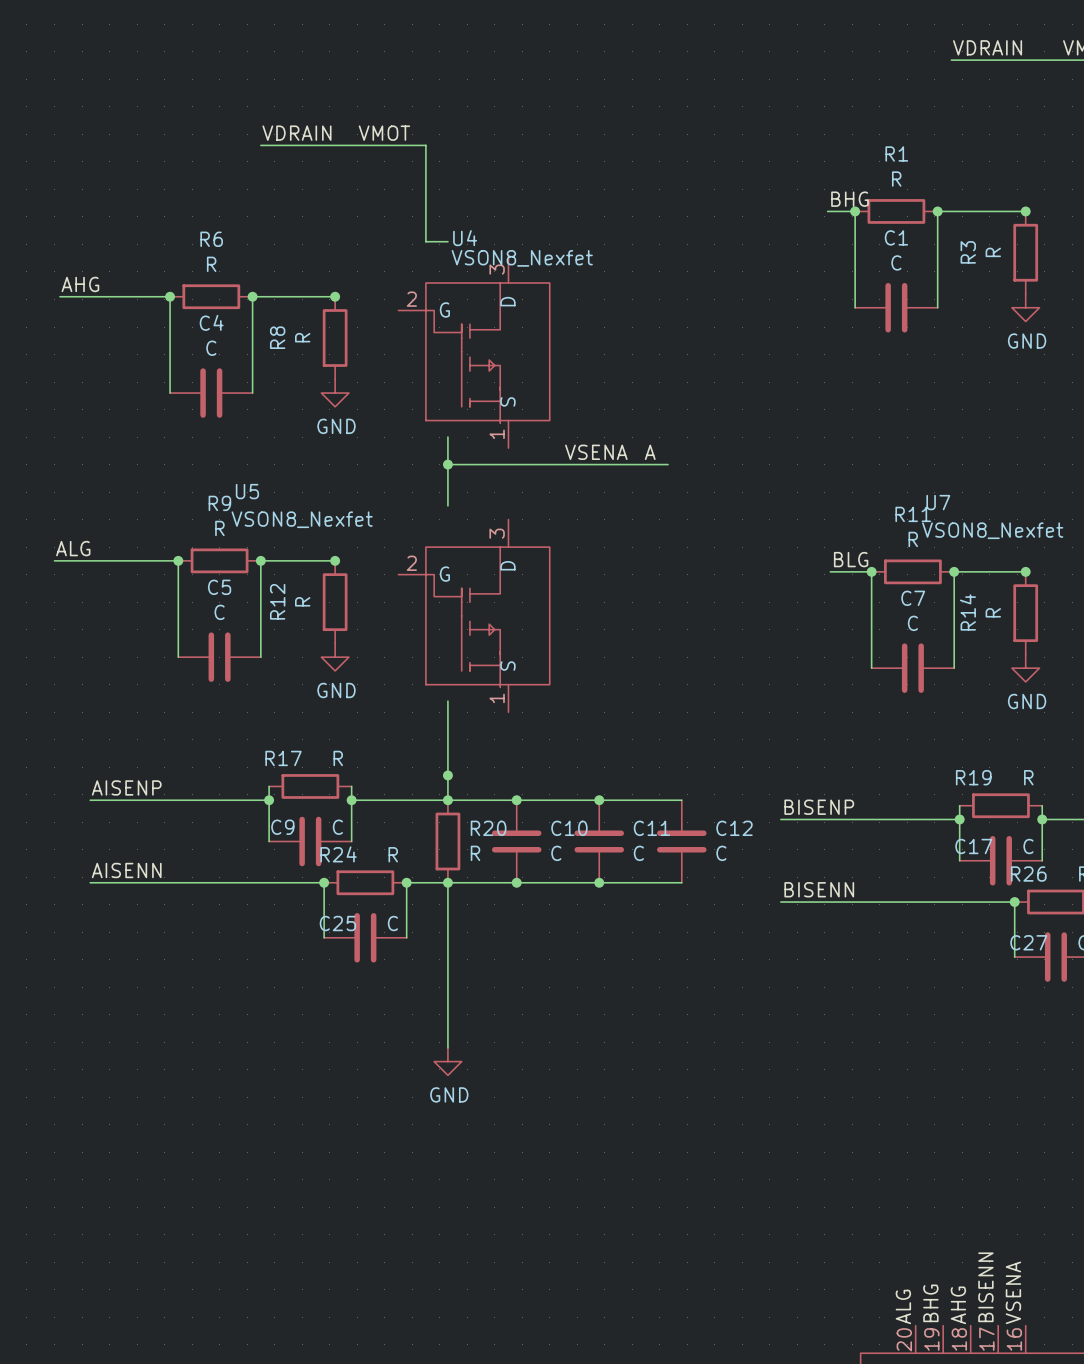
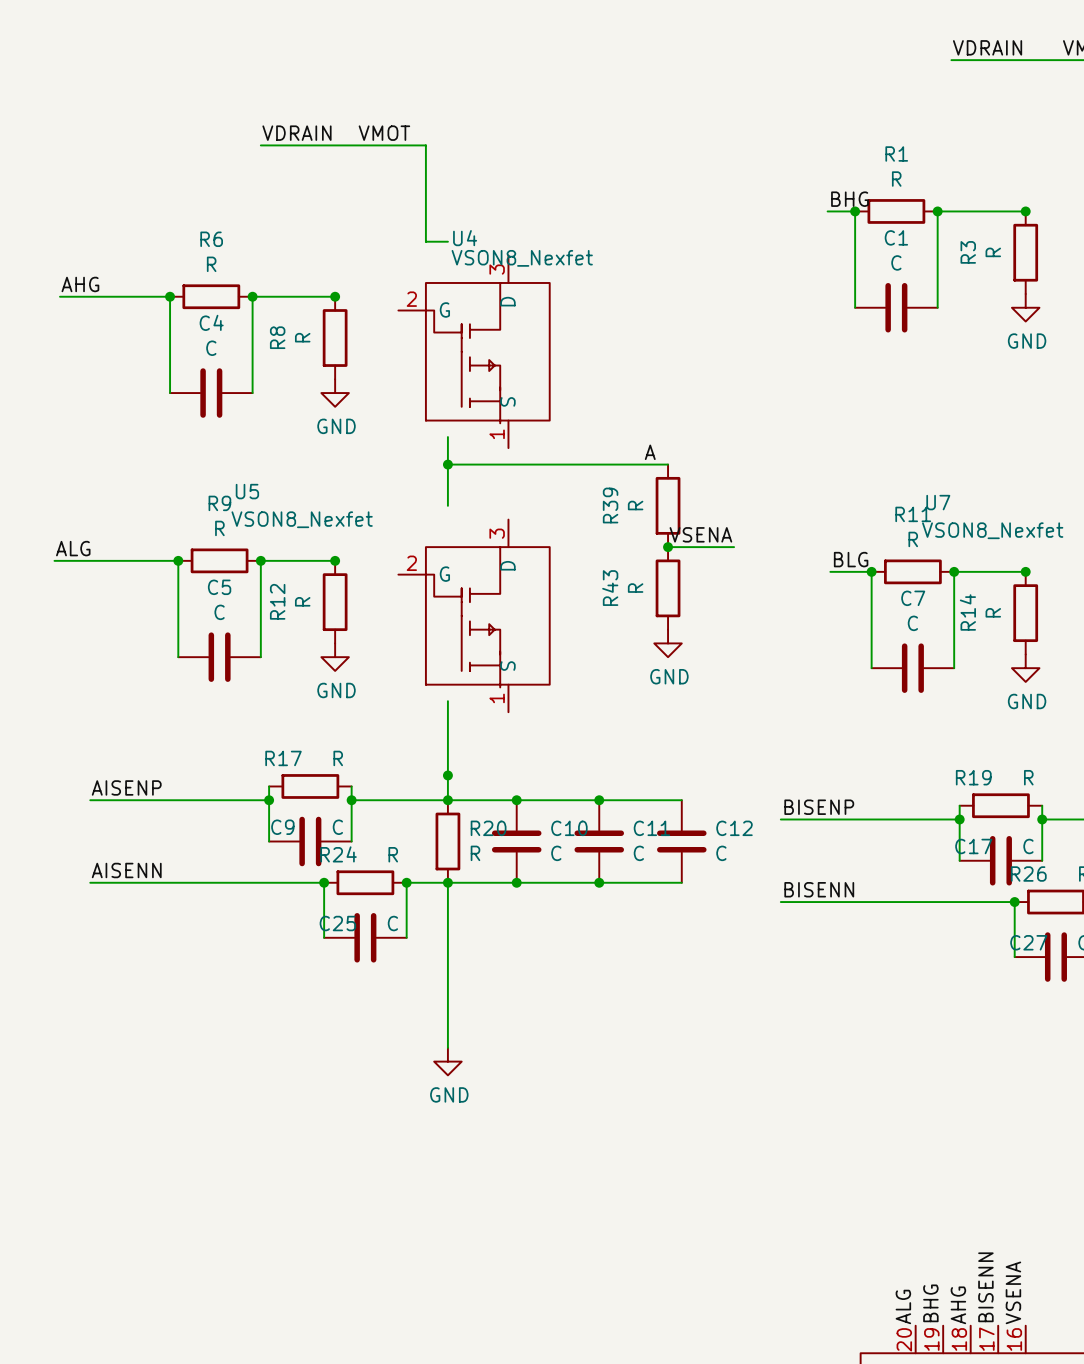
label position: VSENA (596, 452) -> VSENA (700, 534)
R39: none -> R (668, 505)
wire: none -> (668, 547) (734, 547)
junction: none -> (668, 547)
R43: none -> R (668, 588)
power symbol: none -> GND (668, 643)

